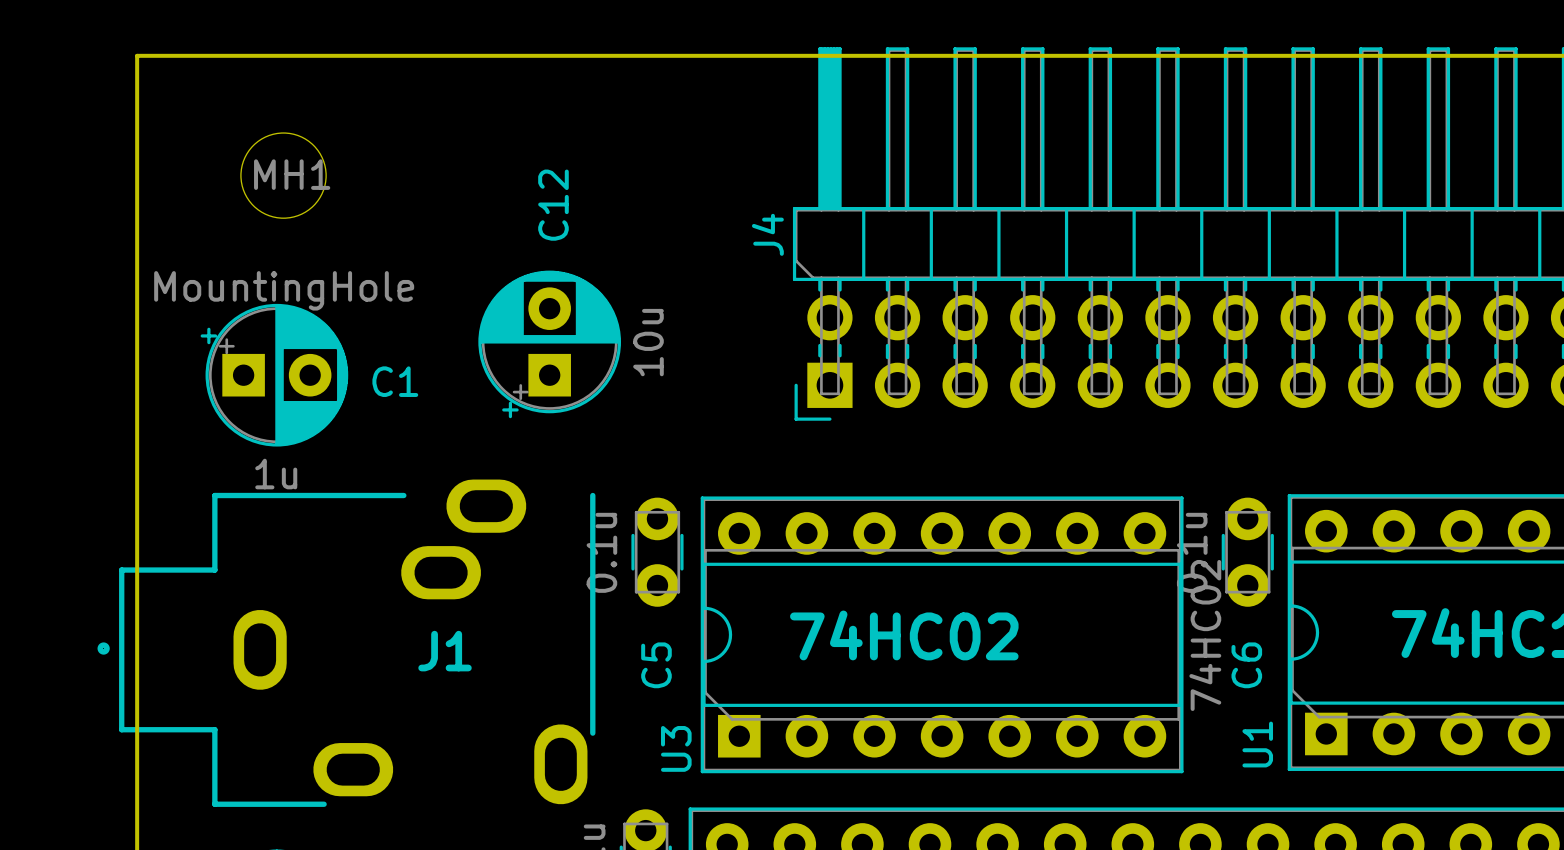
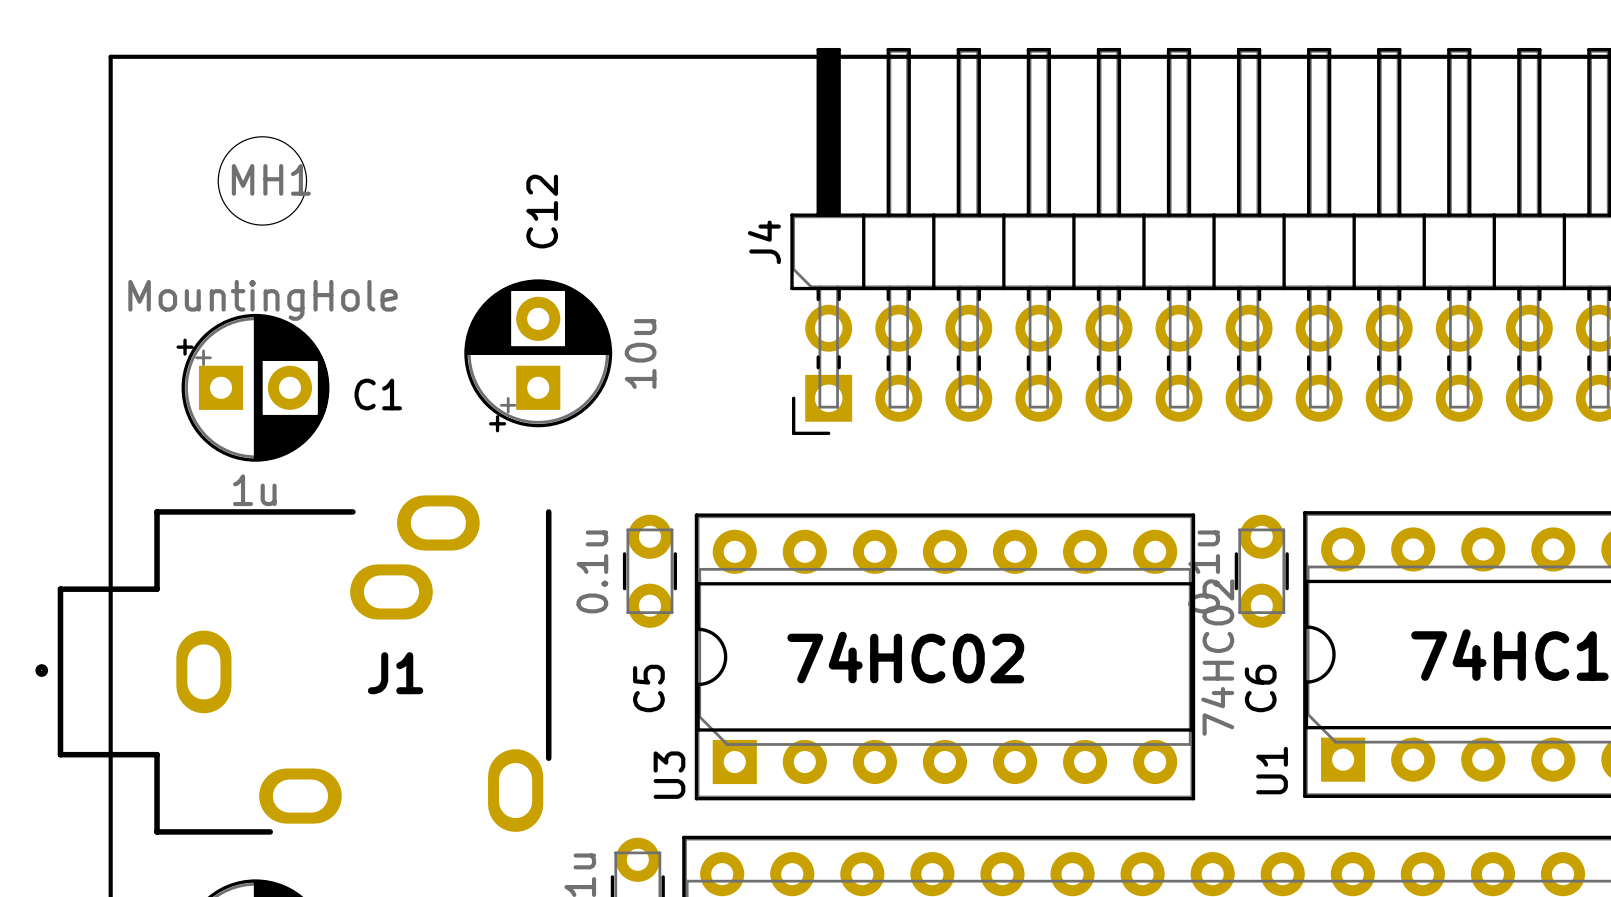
J1 position: (346, 643) -> (293, 665)

